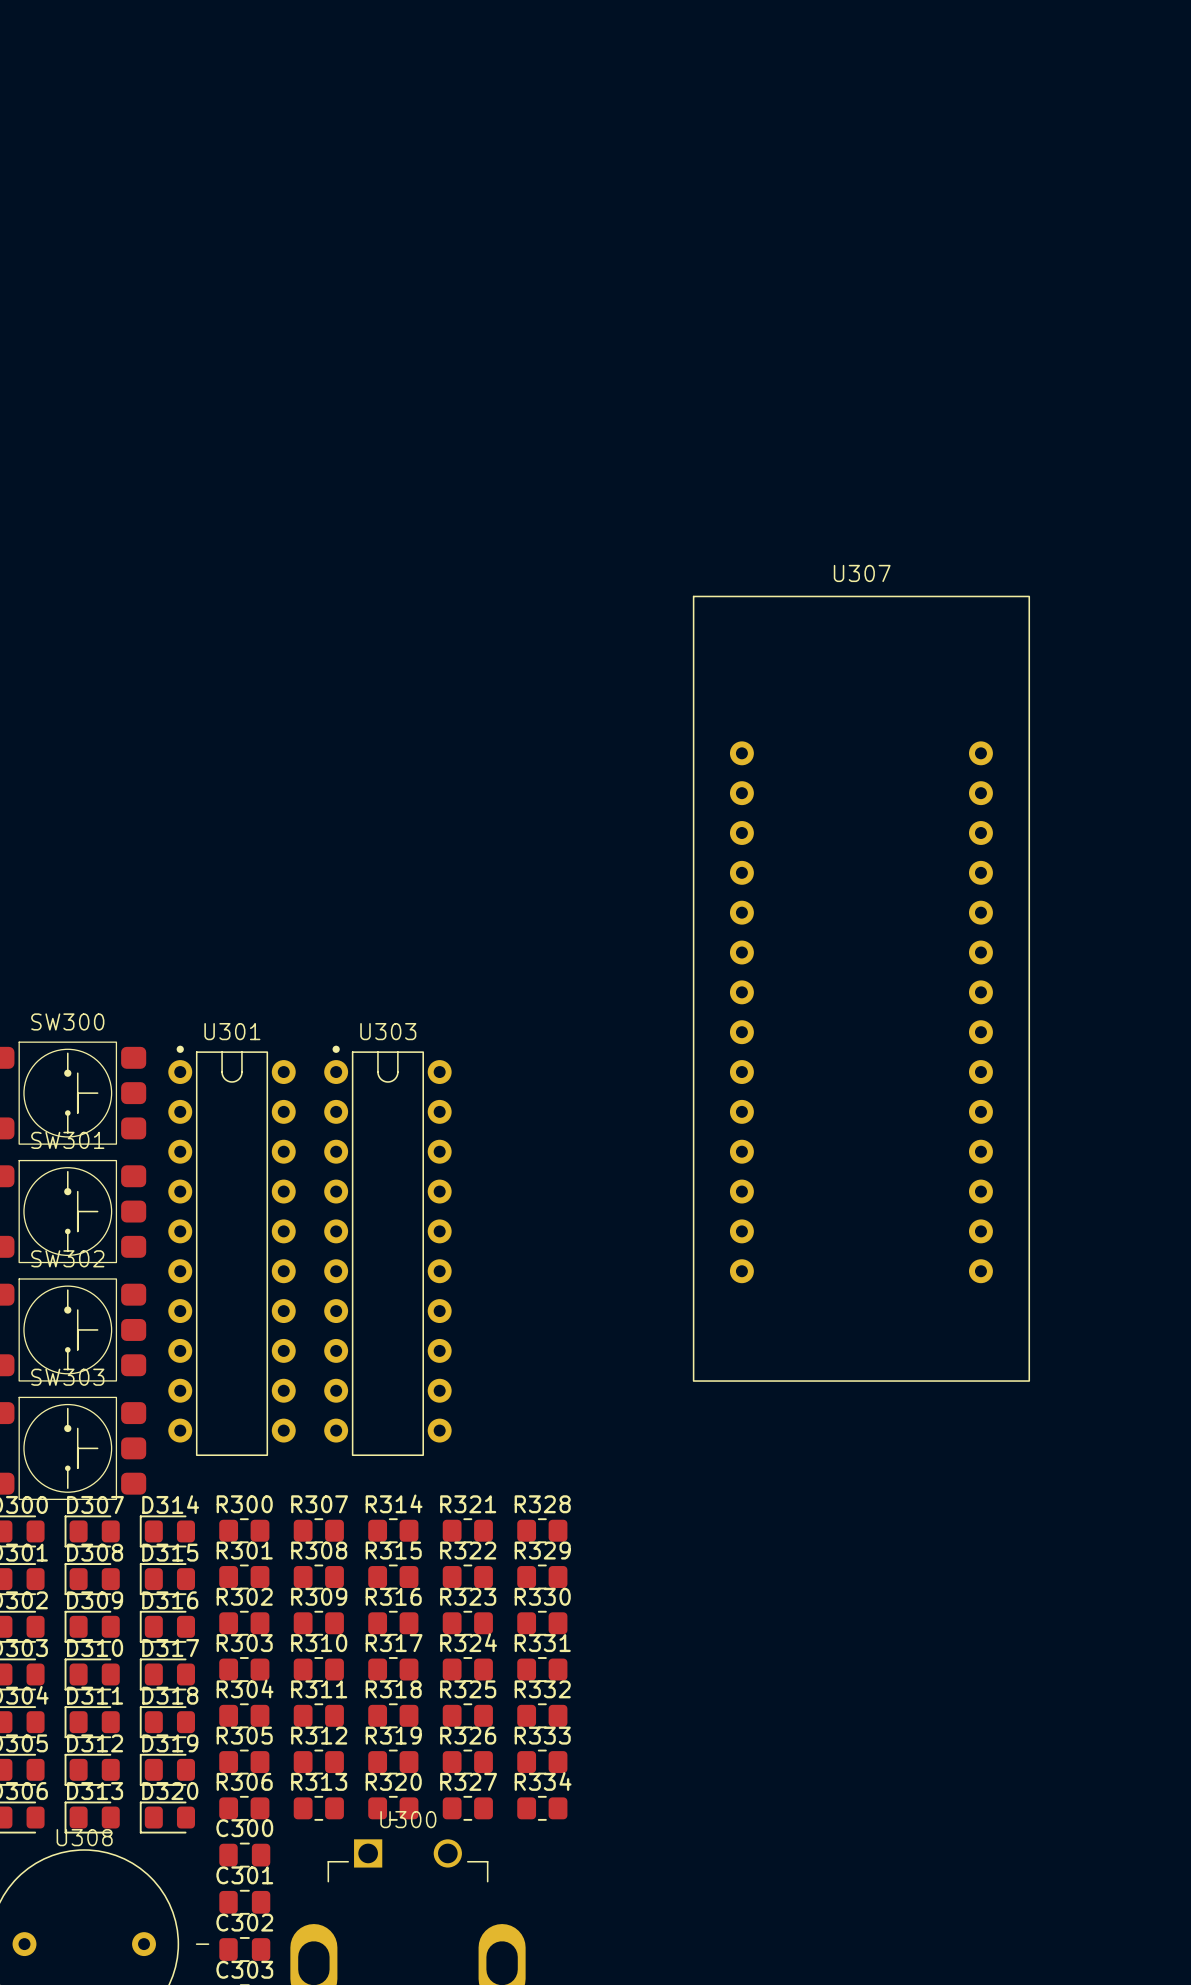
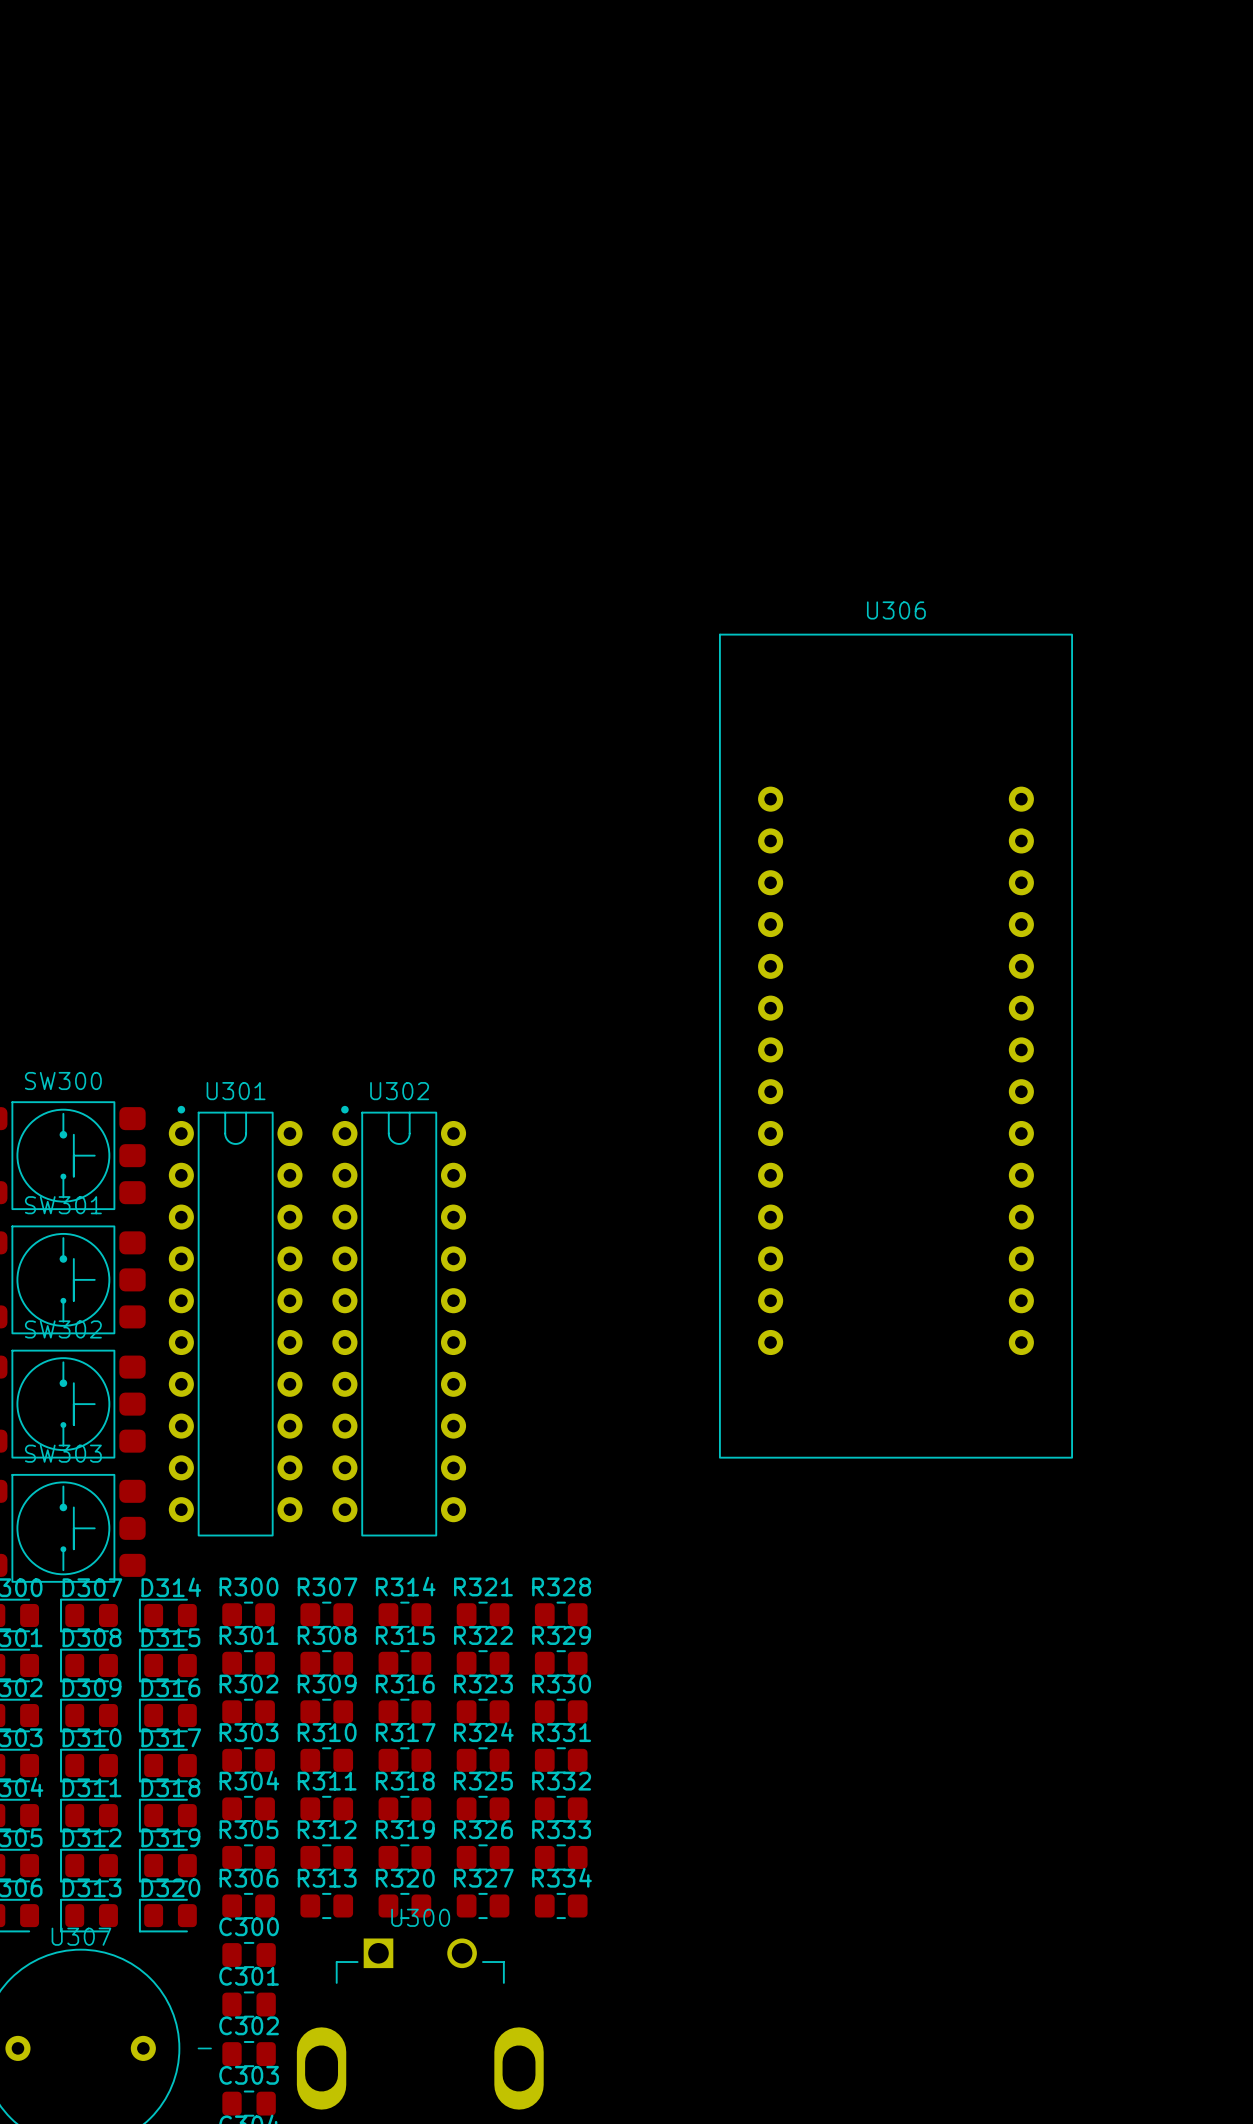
U307 name: U307 (862, 573) -> U306 (896, 610)
U303 name: U303 (388, 1031) -> U302 (399, 1091)
U308 name: U308 (84, 1837) -> U307 (81, 1936)

